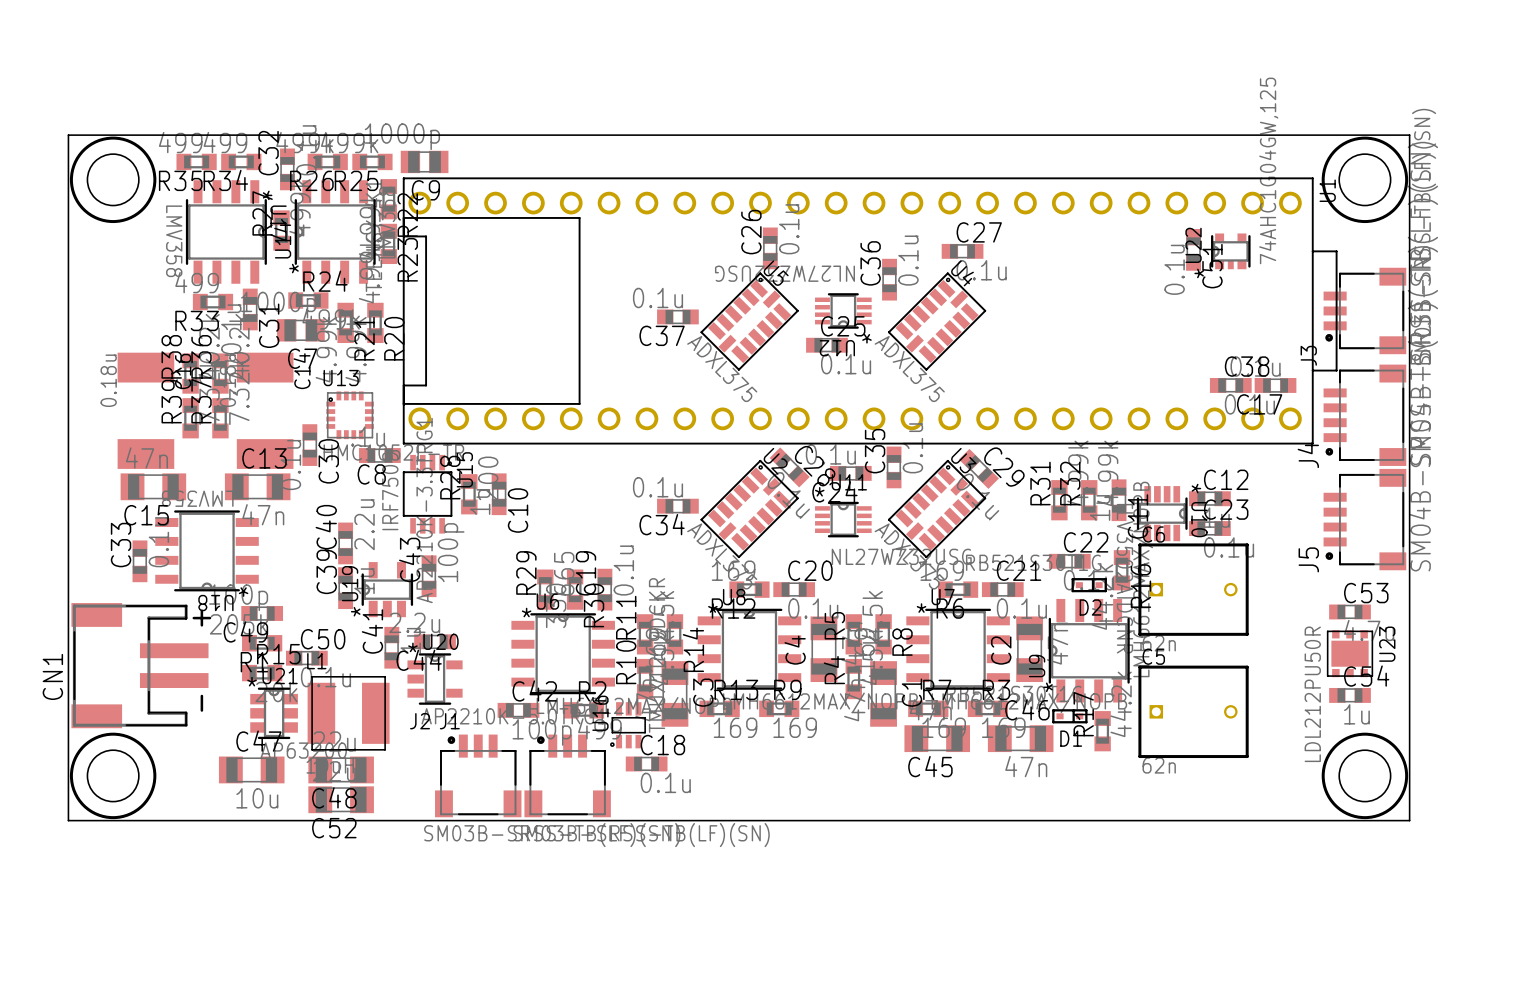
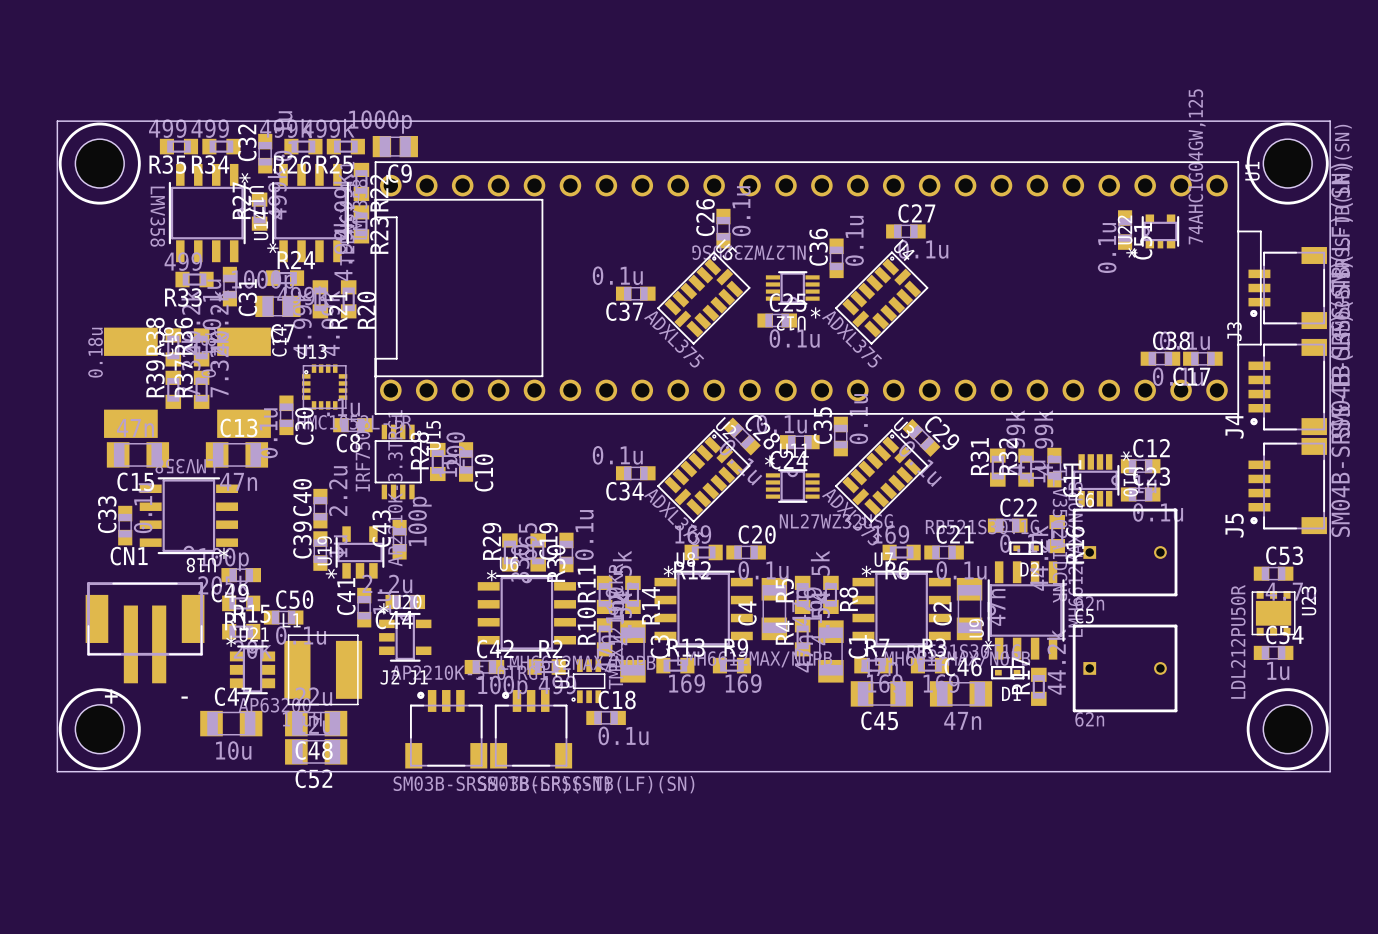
CN1 footprint: [71, 603, 209, 729] -> [85, 582, 205, 684]
CN1 name position: CN1 (52, 676) -> CN1 (129, 556)

